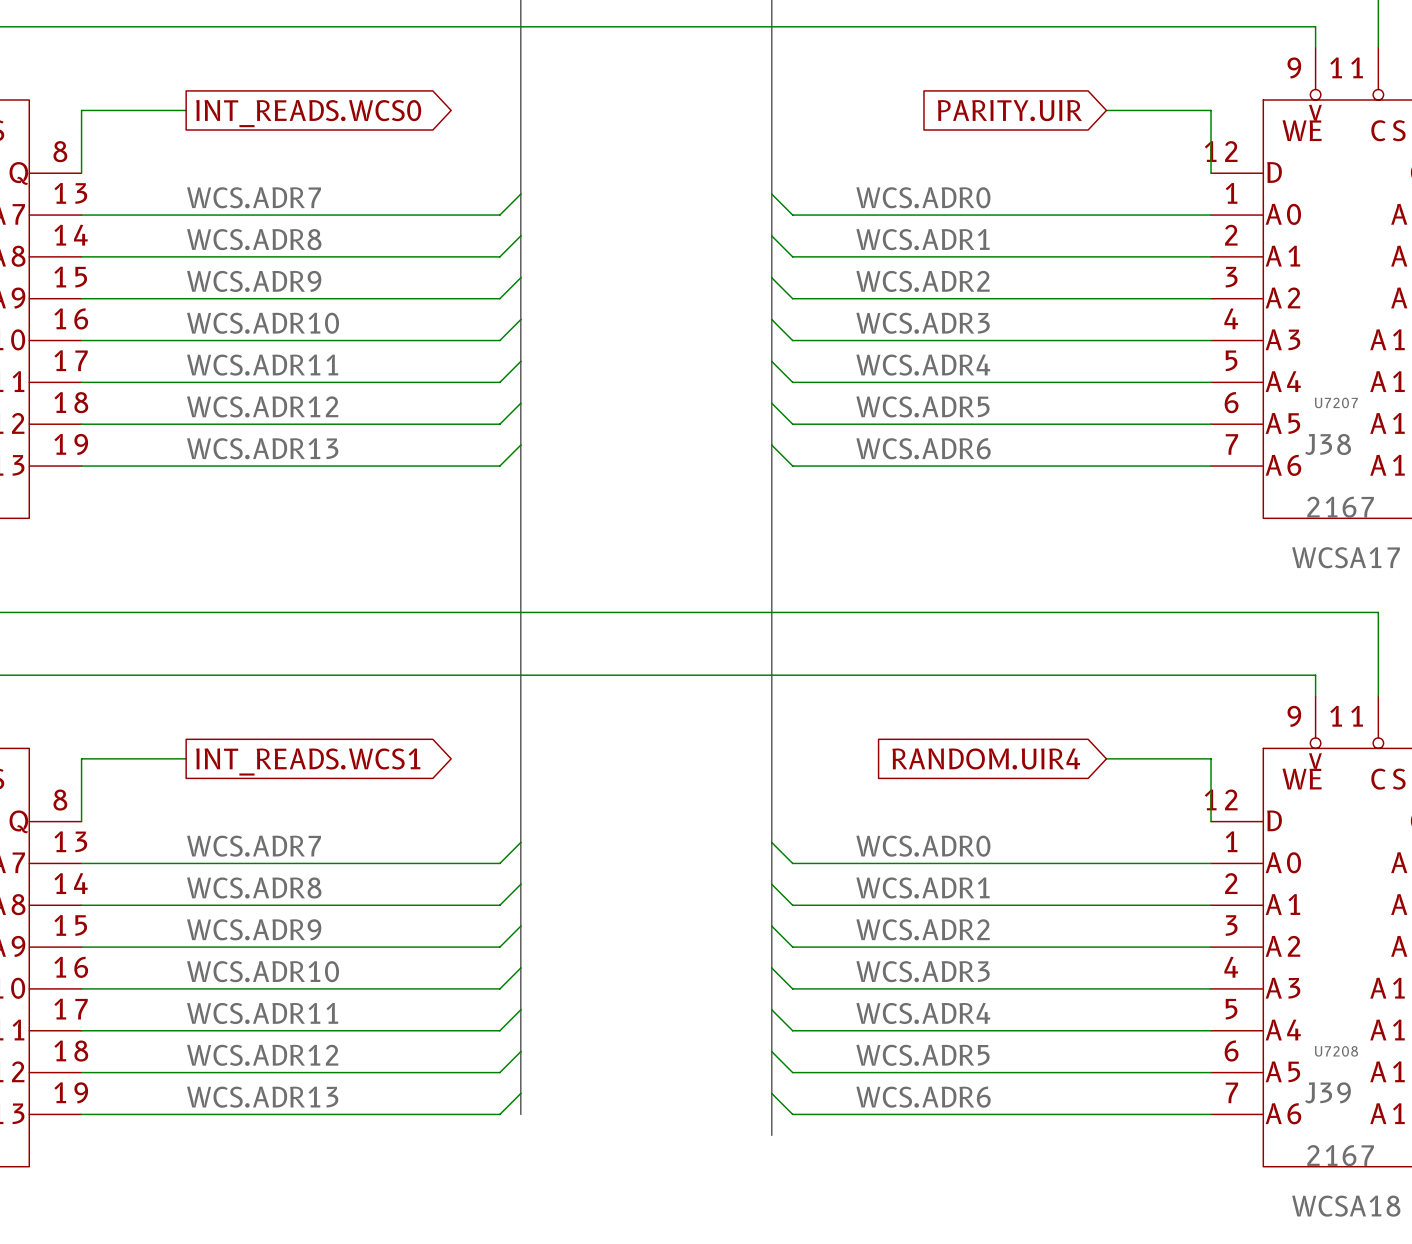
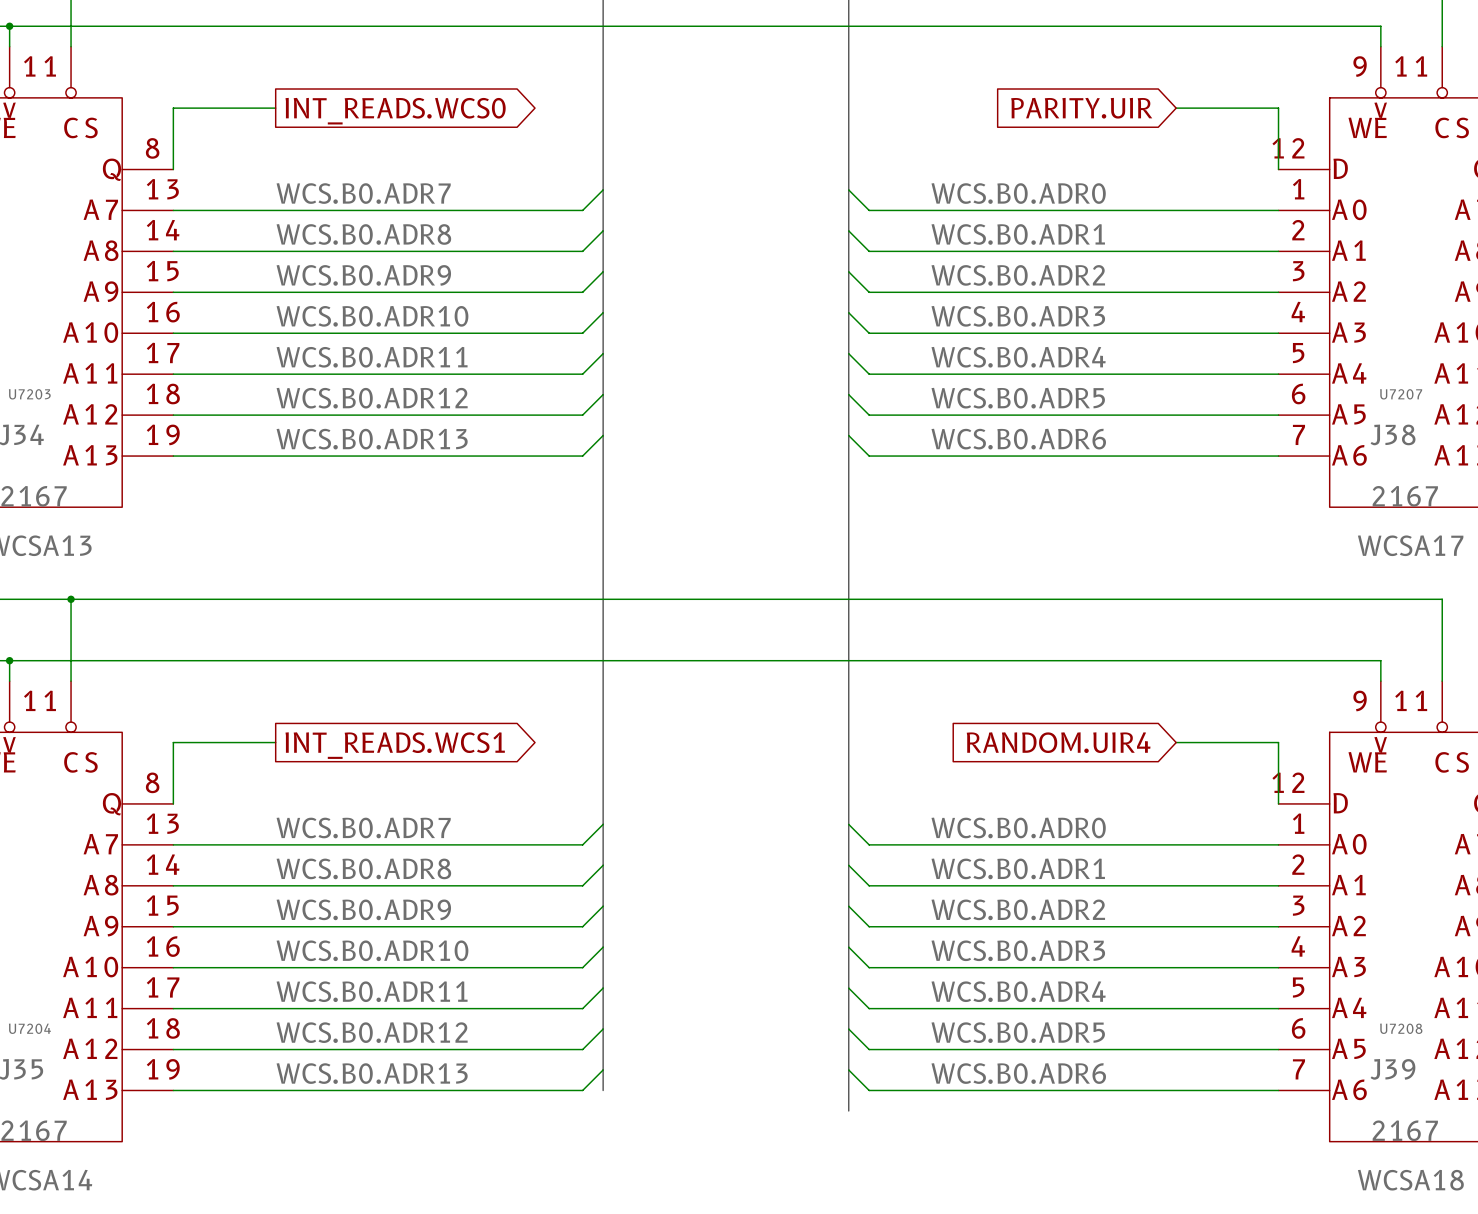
label: WCS.ADR7 (254, 197) -> WCS.B0.ADR7 (363, 193)
label: WCS.ADR0 (923, 197) -> WCS.B0.ADR0 (1018, 193)
label: WCS.ADR8 (254, 239) -> WCS.B0.ADR8 (363, 234)
label: WCS.ADR1 (922, 239) -> WCS.B0.ADR1 (1018, 234)
label: WCS.ADR9 (254, 281) -> WCS.B0.ADR9 (363, 275)
label: WCS.ADR2 (923, 281) -> WCS.B0.ADR2 (1018, 275)
label: WCS.ADR10 (263, 323) -> WCS.B0.ADR10 (372, 316)
label: WCS.ADR3 (923, 323) -> WCS.B0.ADR3 (1018, 316)
label: WCS.ADR11 (262, 365) -> WCS.B0.ADR11 (372, 357)
label: WCS.ADR4 (923, 365) -> WCS.B0.ADR4 (1018, 357)
label: WCS.ADR12 (262, 406) -> WCS.B0.ADR12 (372, 398)
label: WCS.ADR5 (922, 406) -> WCS.B0.ADR5 (1018, 398)
label: WCS.ADR13 (262, 448) -> WCS.B0.ADR13 (372, 439)
label: WCS.ADR6 (923, 448) -> WCS.B0.ADR6 (1018, 439)
label: WCS.ADR7 (254, 846) -> WCS.B0.ADR7 (363, 827)
label: WCS.ADR0 (923, 846) -> WCS.B0.ADR0 (1018, 827)
label: WCS.ADR8 (254, 887) -> WCS.B0.ADR8 (363, 868)
label: WCS.ADR1 (922, 887) -> WCS.B0.ADR1 (1018, 868)
label: WCS.ADR9 (254, 929) -> WCS.B0.ADR9 (363, 909)
label: WCS.ADR2 (923, 929) -> WCS.B0.ADR2 (1018, 909)
label: WCS.ADR10 (263, 971) -> WCS.B0.ADR10 (372, 950)
label: WCS.ADR3 (923, 971) -> WCS.B0.ADR3 (1018, 950)
label: WCS.ADR11 (262, 1013) -> WCS.B0.ADR11 (372, 991)
label: WCS.ADR4 (923, 1013) -> WCS.B0.ADR4 (1018, 991)
label: WCS.ADR12 (262, 1055) -> WCS.B0.ADR12 (372, 1032)
label: WCS.ADR5 (922, 1055) -> WCS.B0.ADR5 (1018, 1032)
label: WCS.ADR13 (262, 1097) -> WCS.B0.ADR13 (372, 1073)
label: WCS.ADR6 (923, 1097) -> WCS.B0.ADR6 (1018, 1073)

